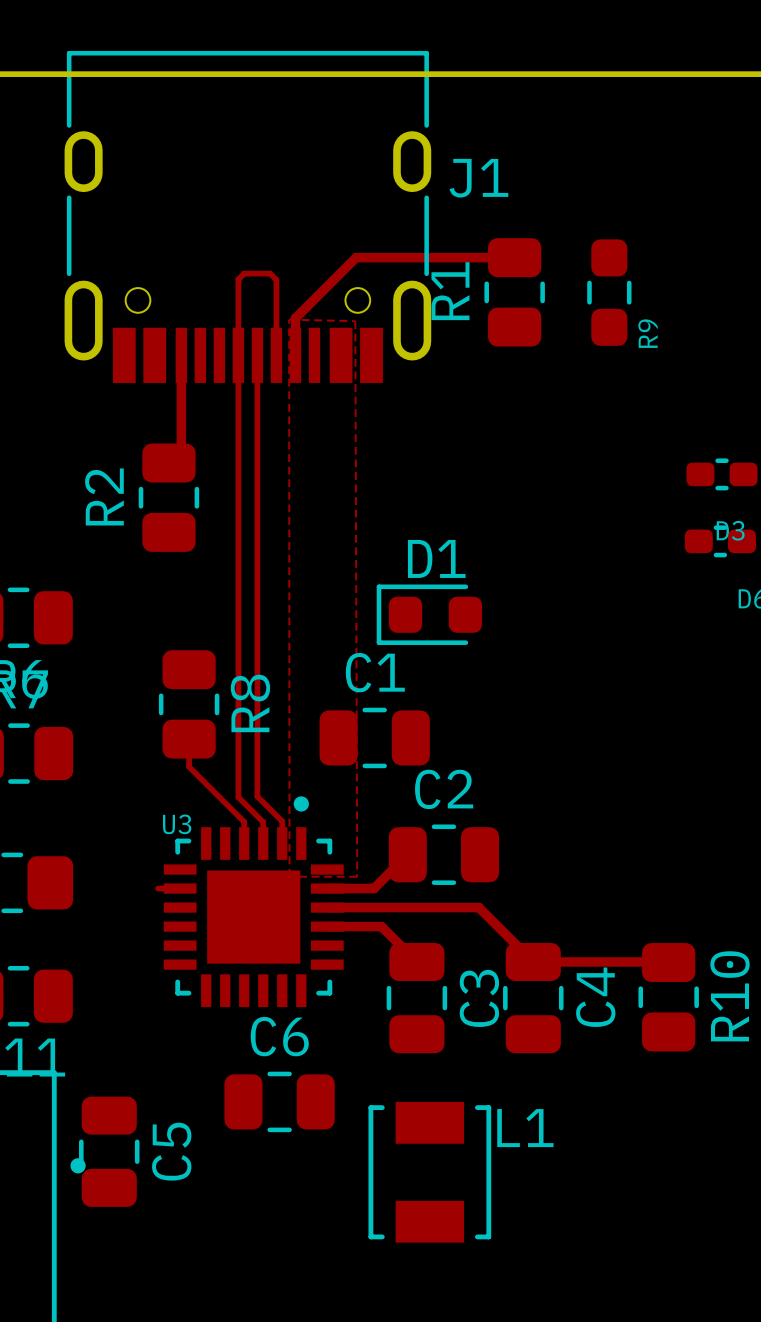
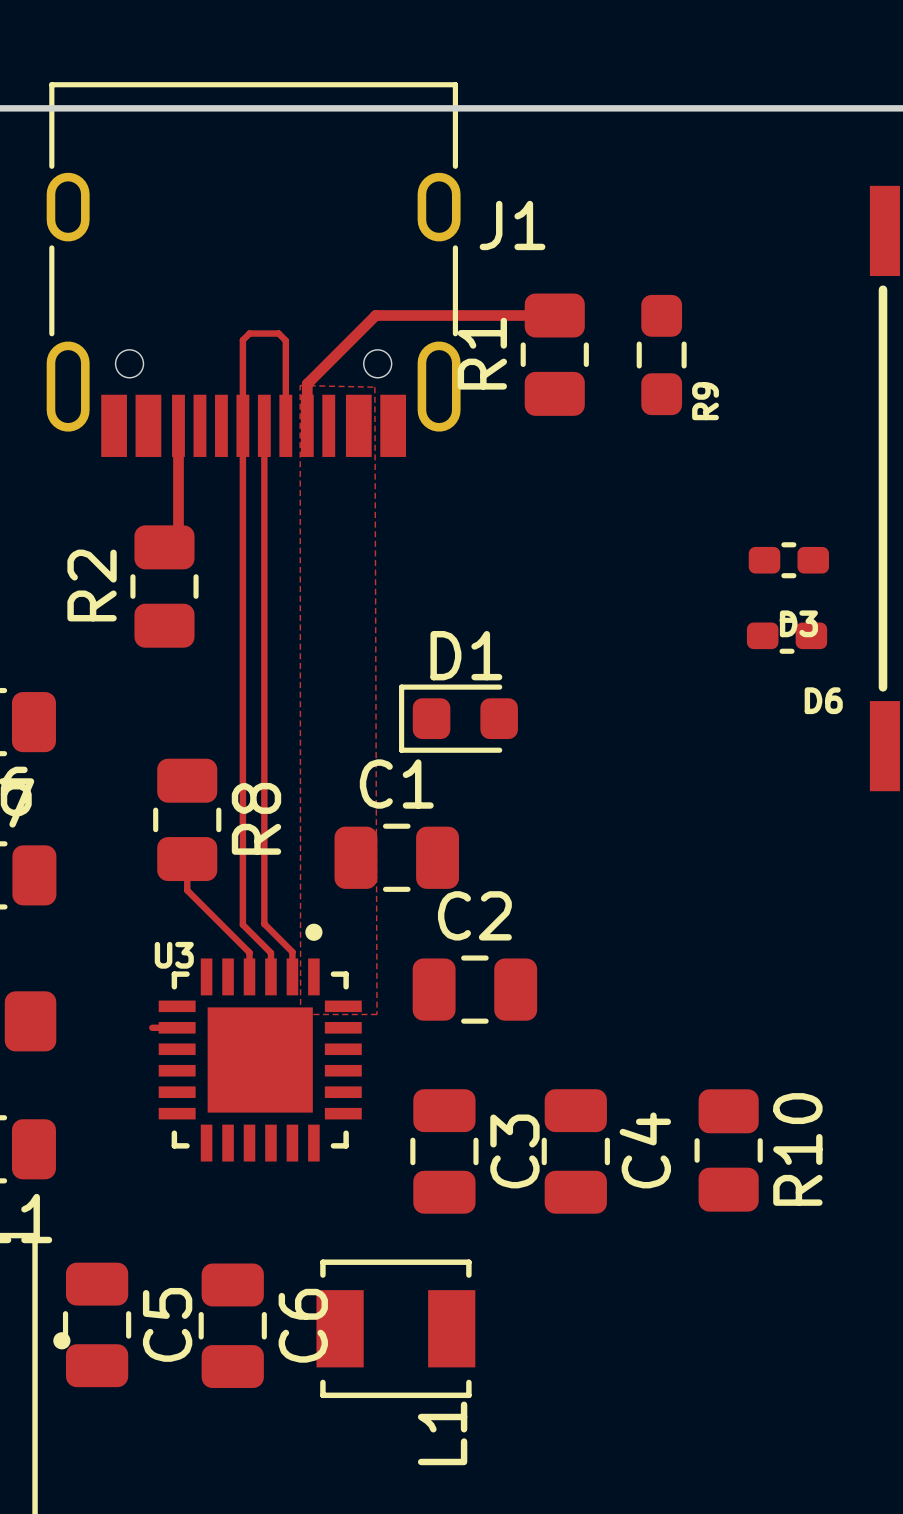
track: (407, 854) (373, 888) (327, 888) -> none
track: (327, 907) (478, 907) (533, 961) (668, 962) -> none
track: (327, 926) (381, 926) (416, 961) -> none
C6 rotation: 0° (279, 1101) -> 90° clockwise (232, 1325)
C6 position: (279, 1101) -> (232, 1325)
L1 rotation: 0° (429, 1172) -> 90° clockwise (395, 1328)

